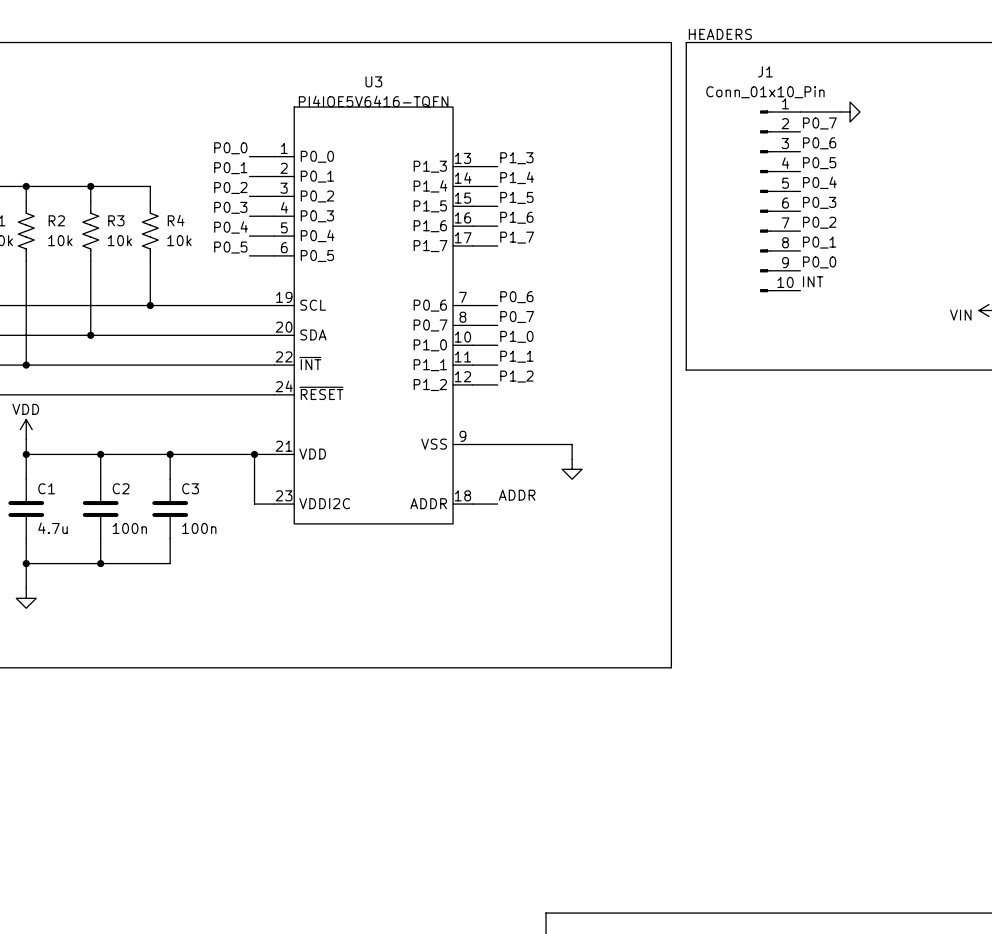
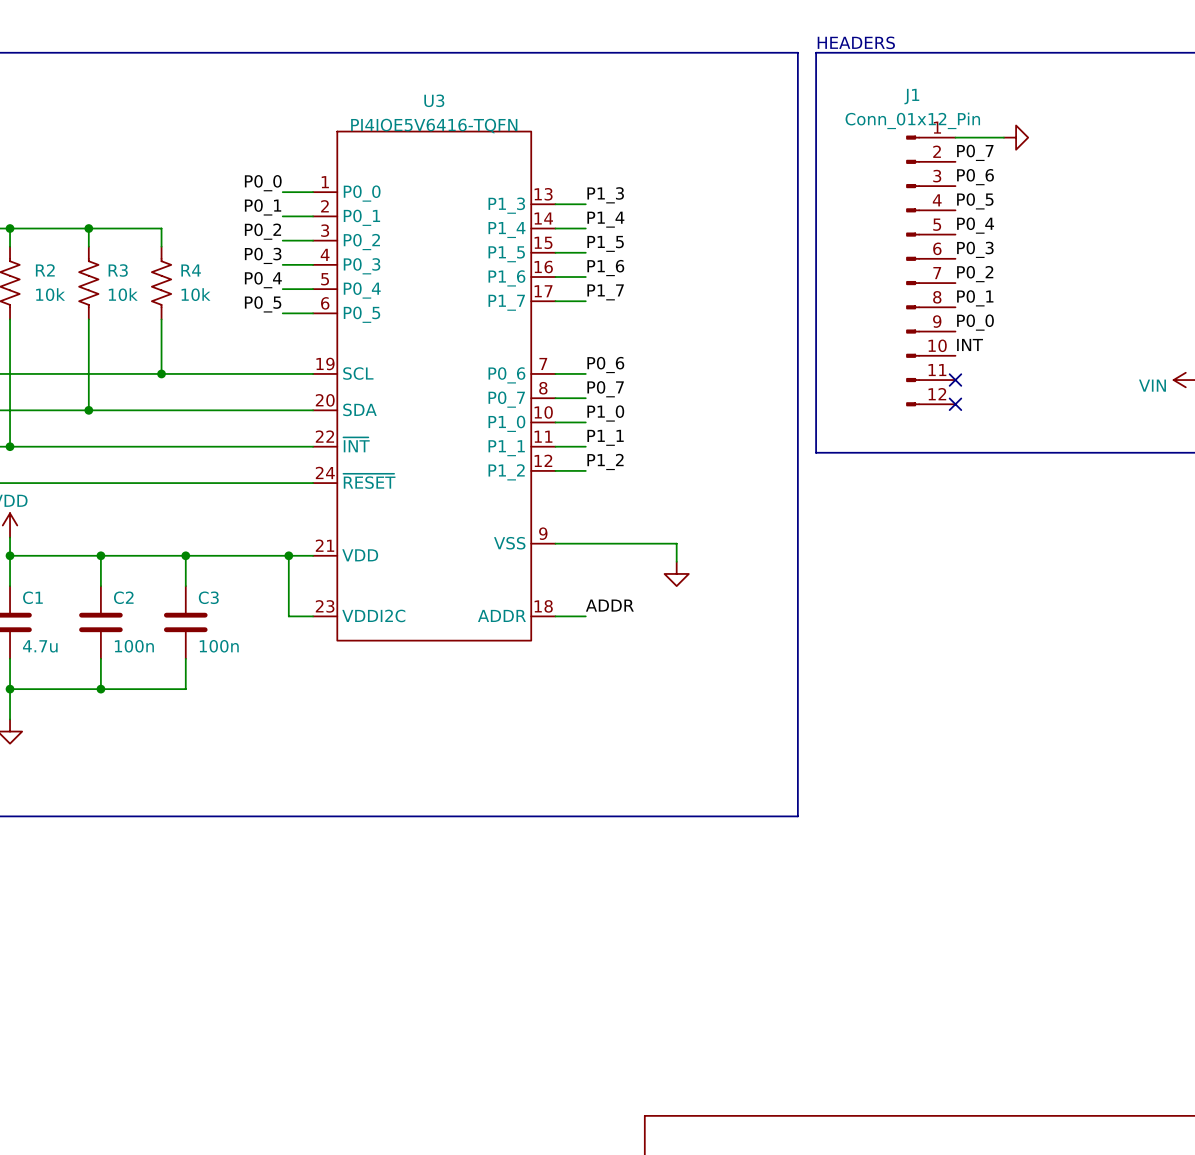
J1 value: Conn_01x10_Pin (765, 92) -> Conn_01x12_Pin (912, 120)
J1 symbol: [760, 110, 801, 293] -> [906, 135, 956, 407]
no-connect mark: none -> (955, 380)
no-connect mark: none -> (955, 404)

